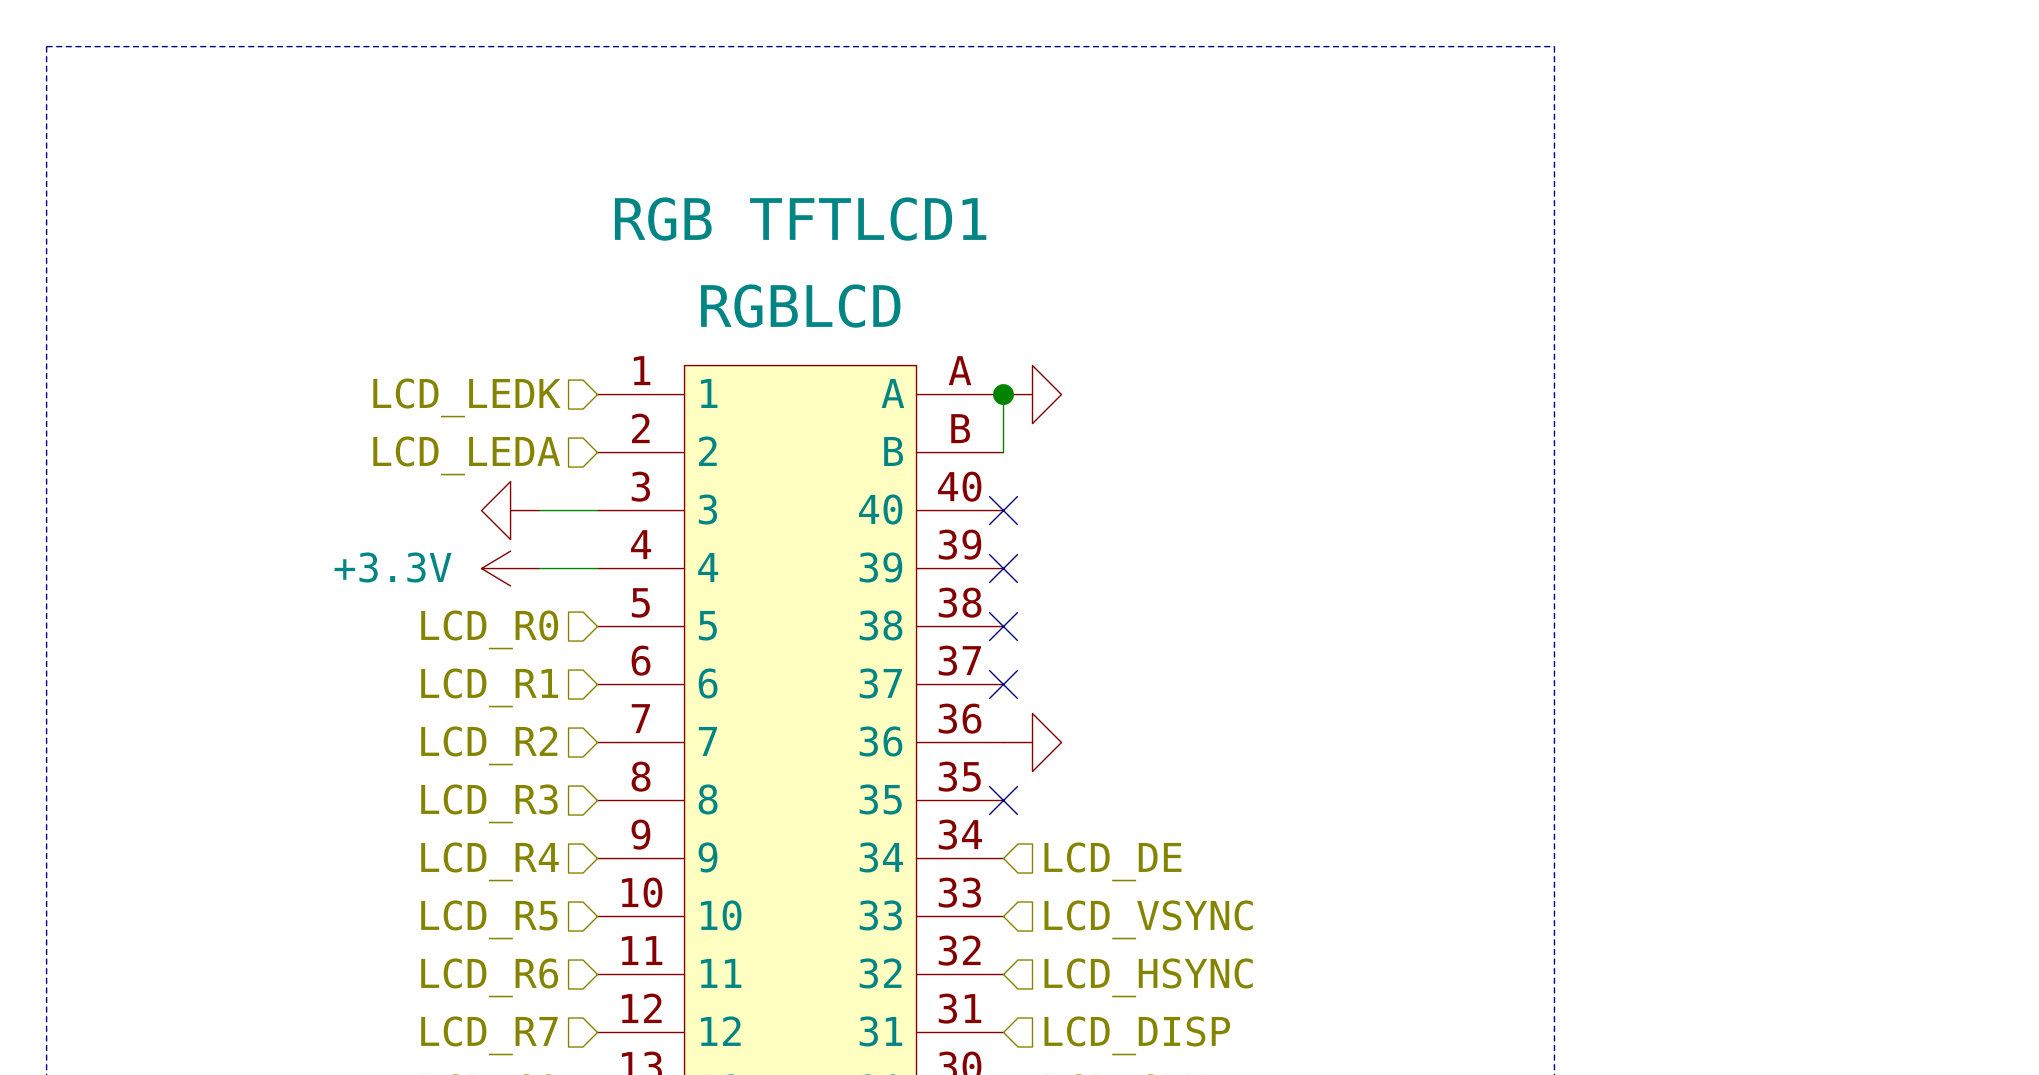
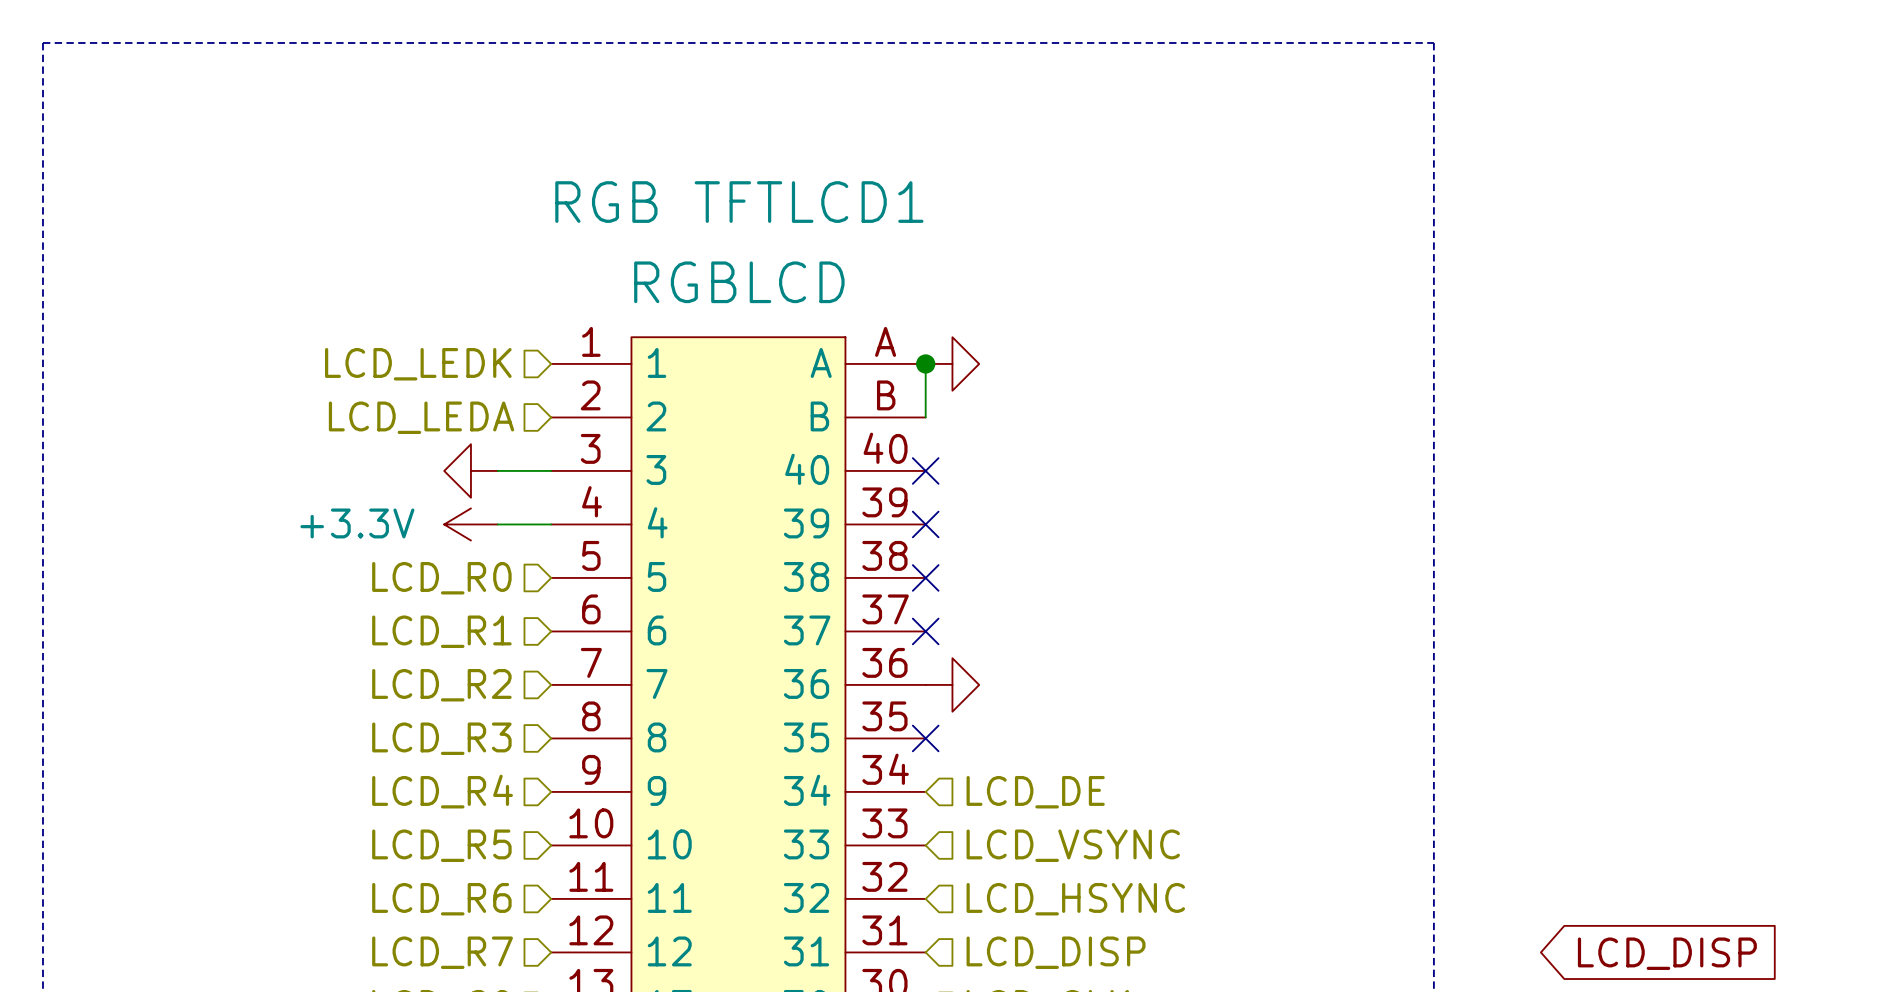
global label: none -> LCD_DISP (1667, 953)

